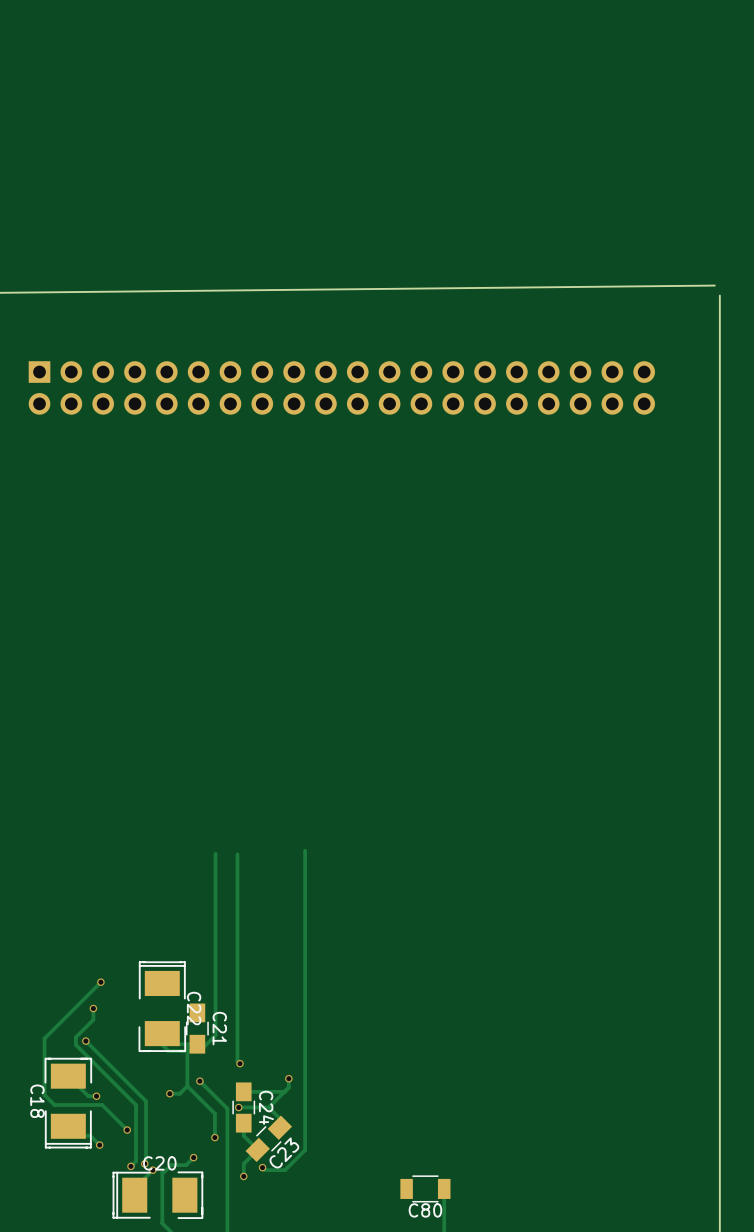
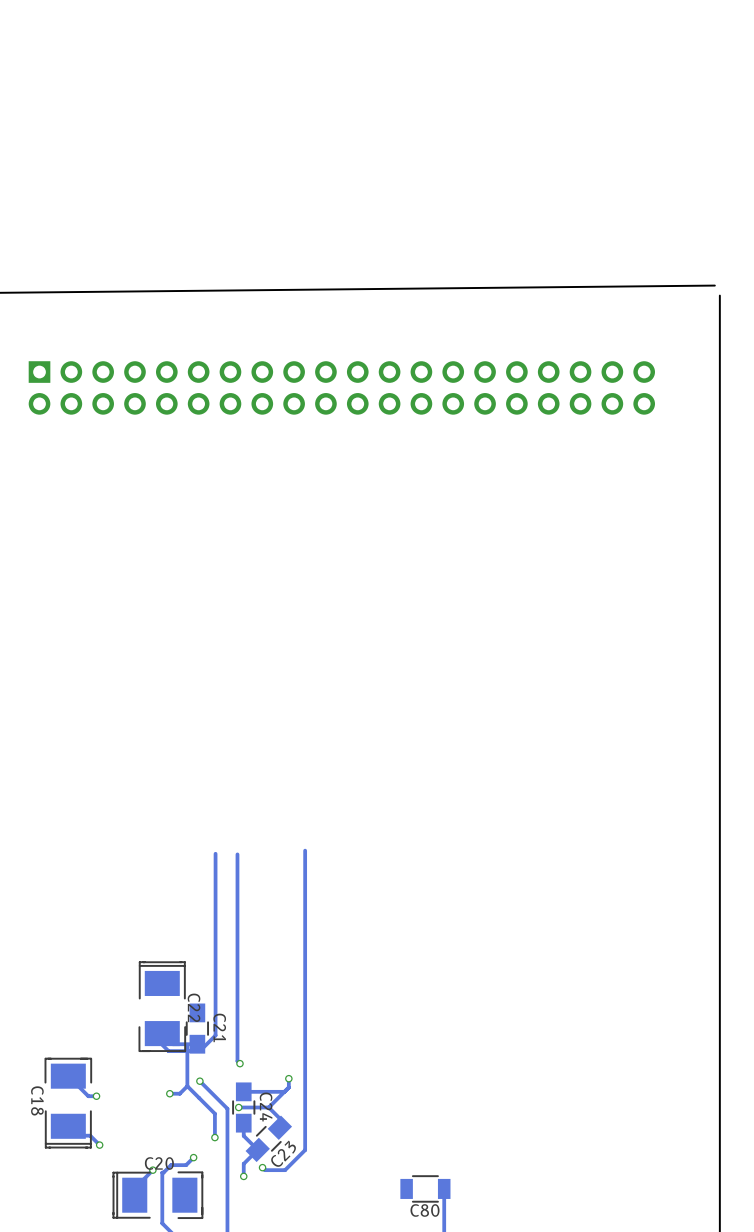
track: (100, 982) (44, 1038) (44, 1094) (54, 1104) (102, 1104) (127, 1130) -> none
via: (100, 982) -> none
track: (93, 1008) (93, 1019) (75, 1037) (75, 1044) (135, 1104) (135, 1161) (130, 1166) -> none
via: (93, 1008) -> none
track: (85, 1041) (146, 1101) (144, 1163) -> none
via: (85, 1041) -> none
via: (127, 1130) -> none
via: (144, 1163) -> none
via: (130, 1166) -> none

